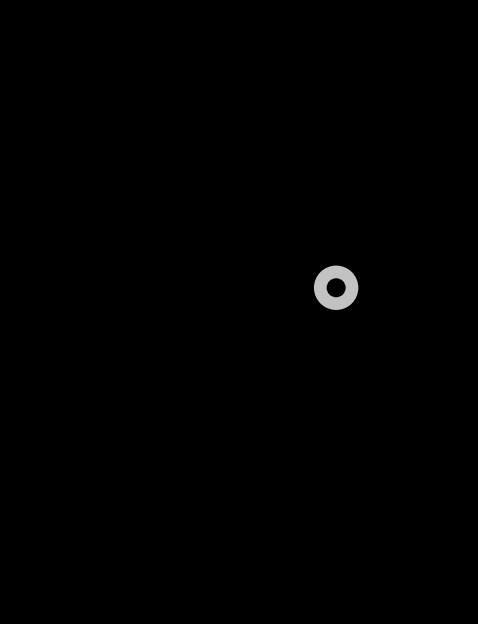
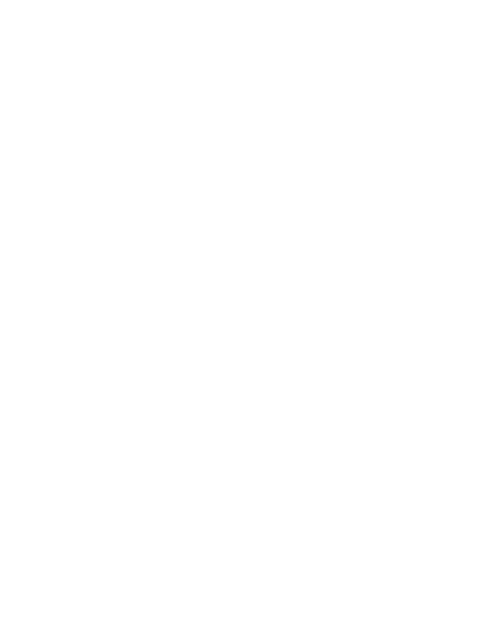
via: (336, 287) -> none

